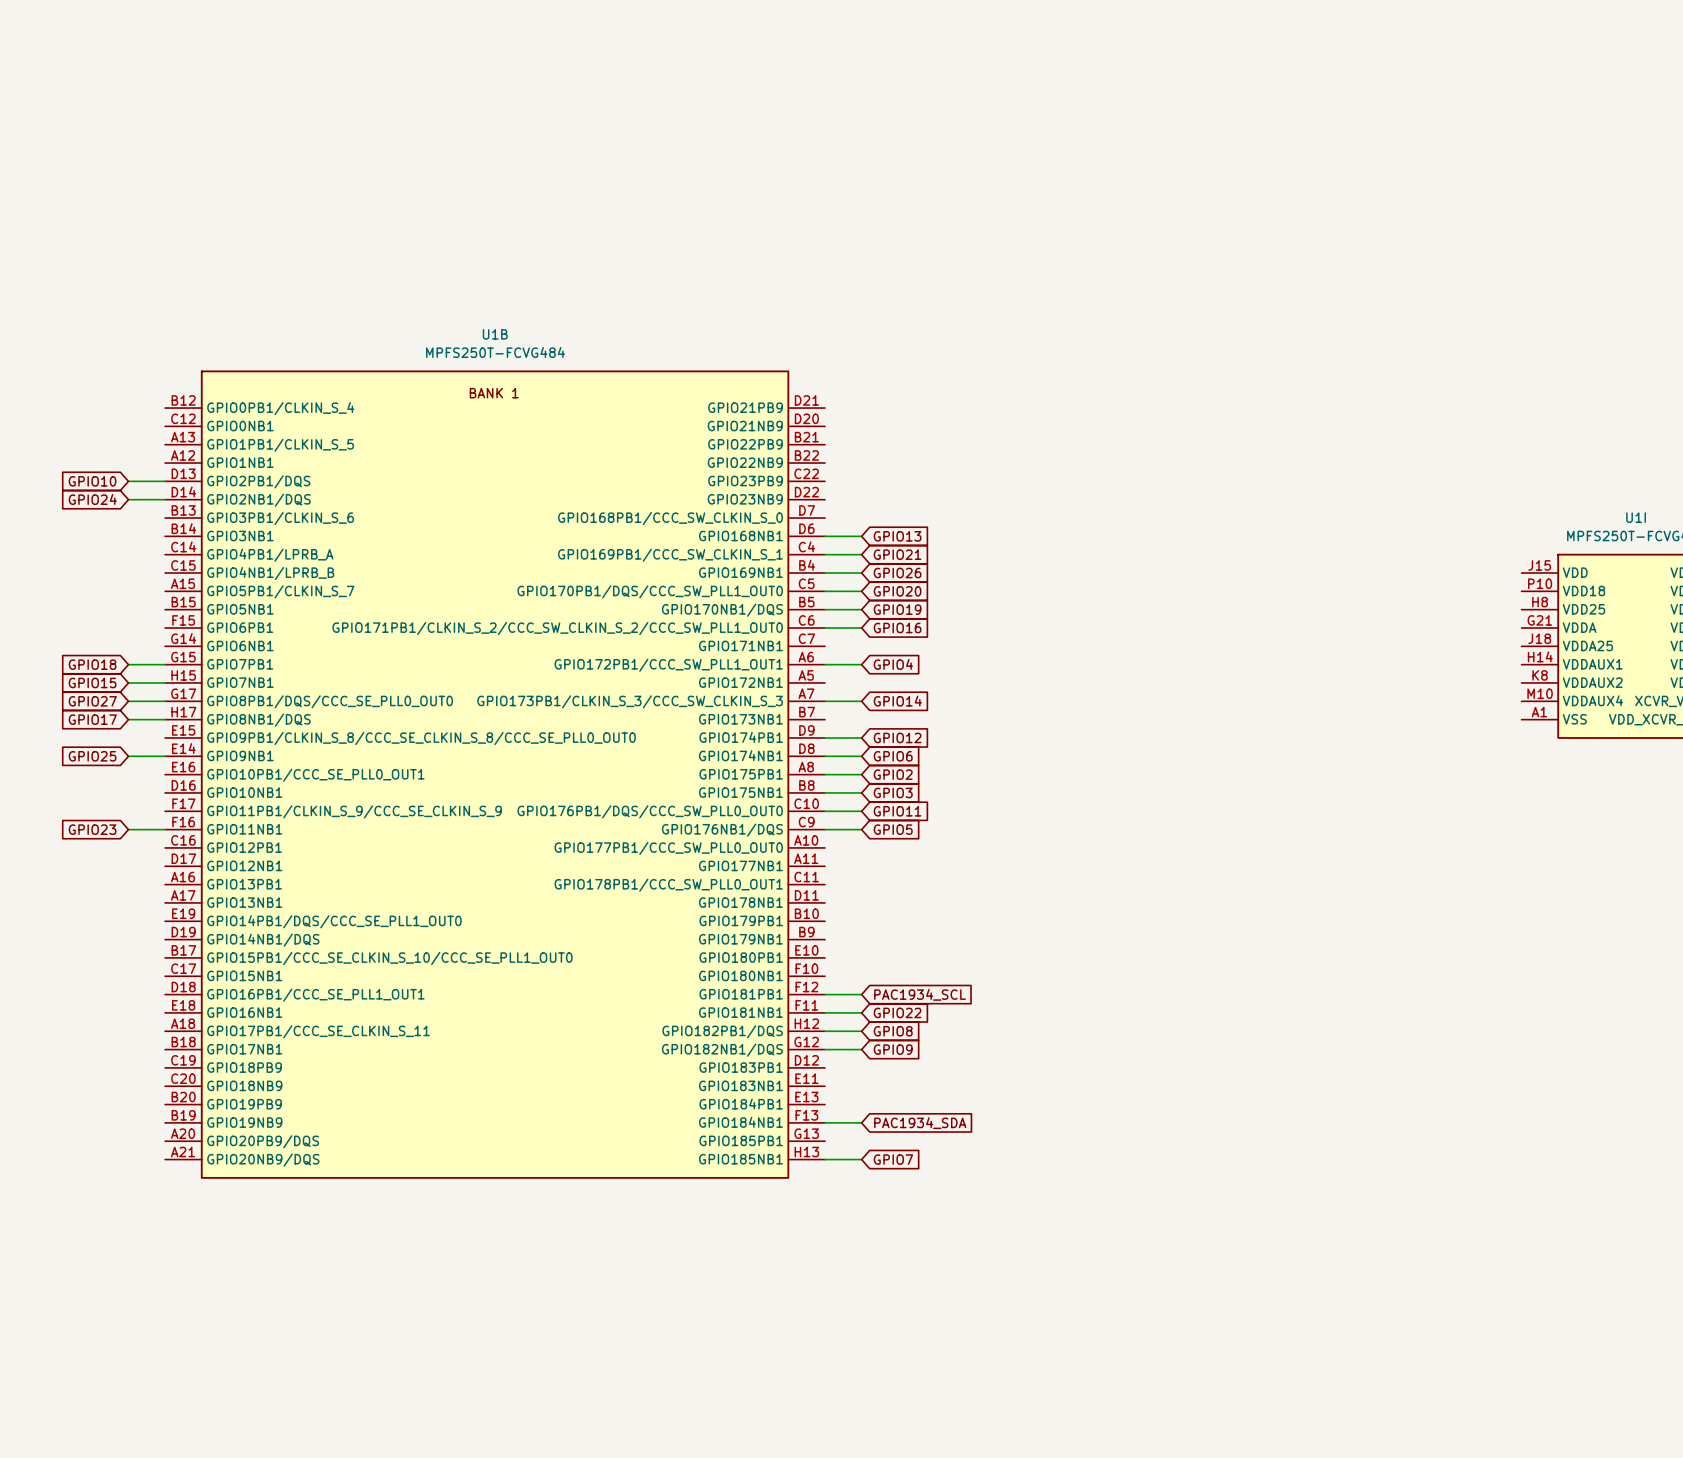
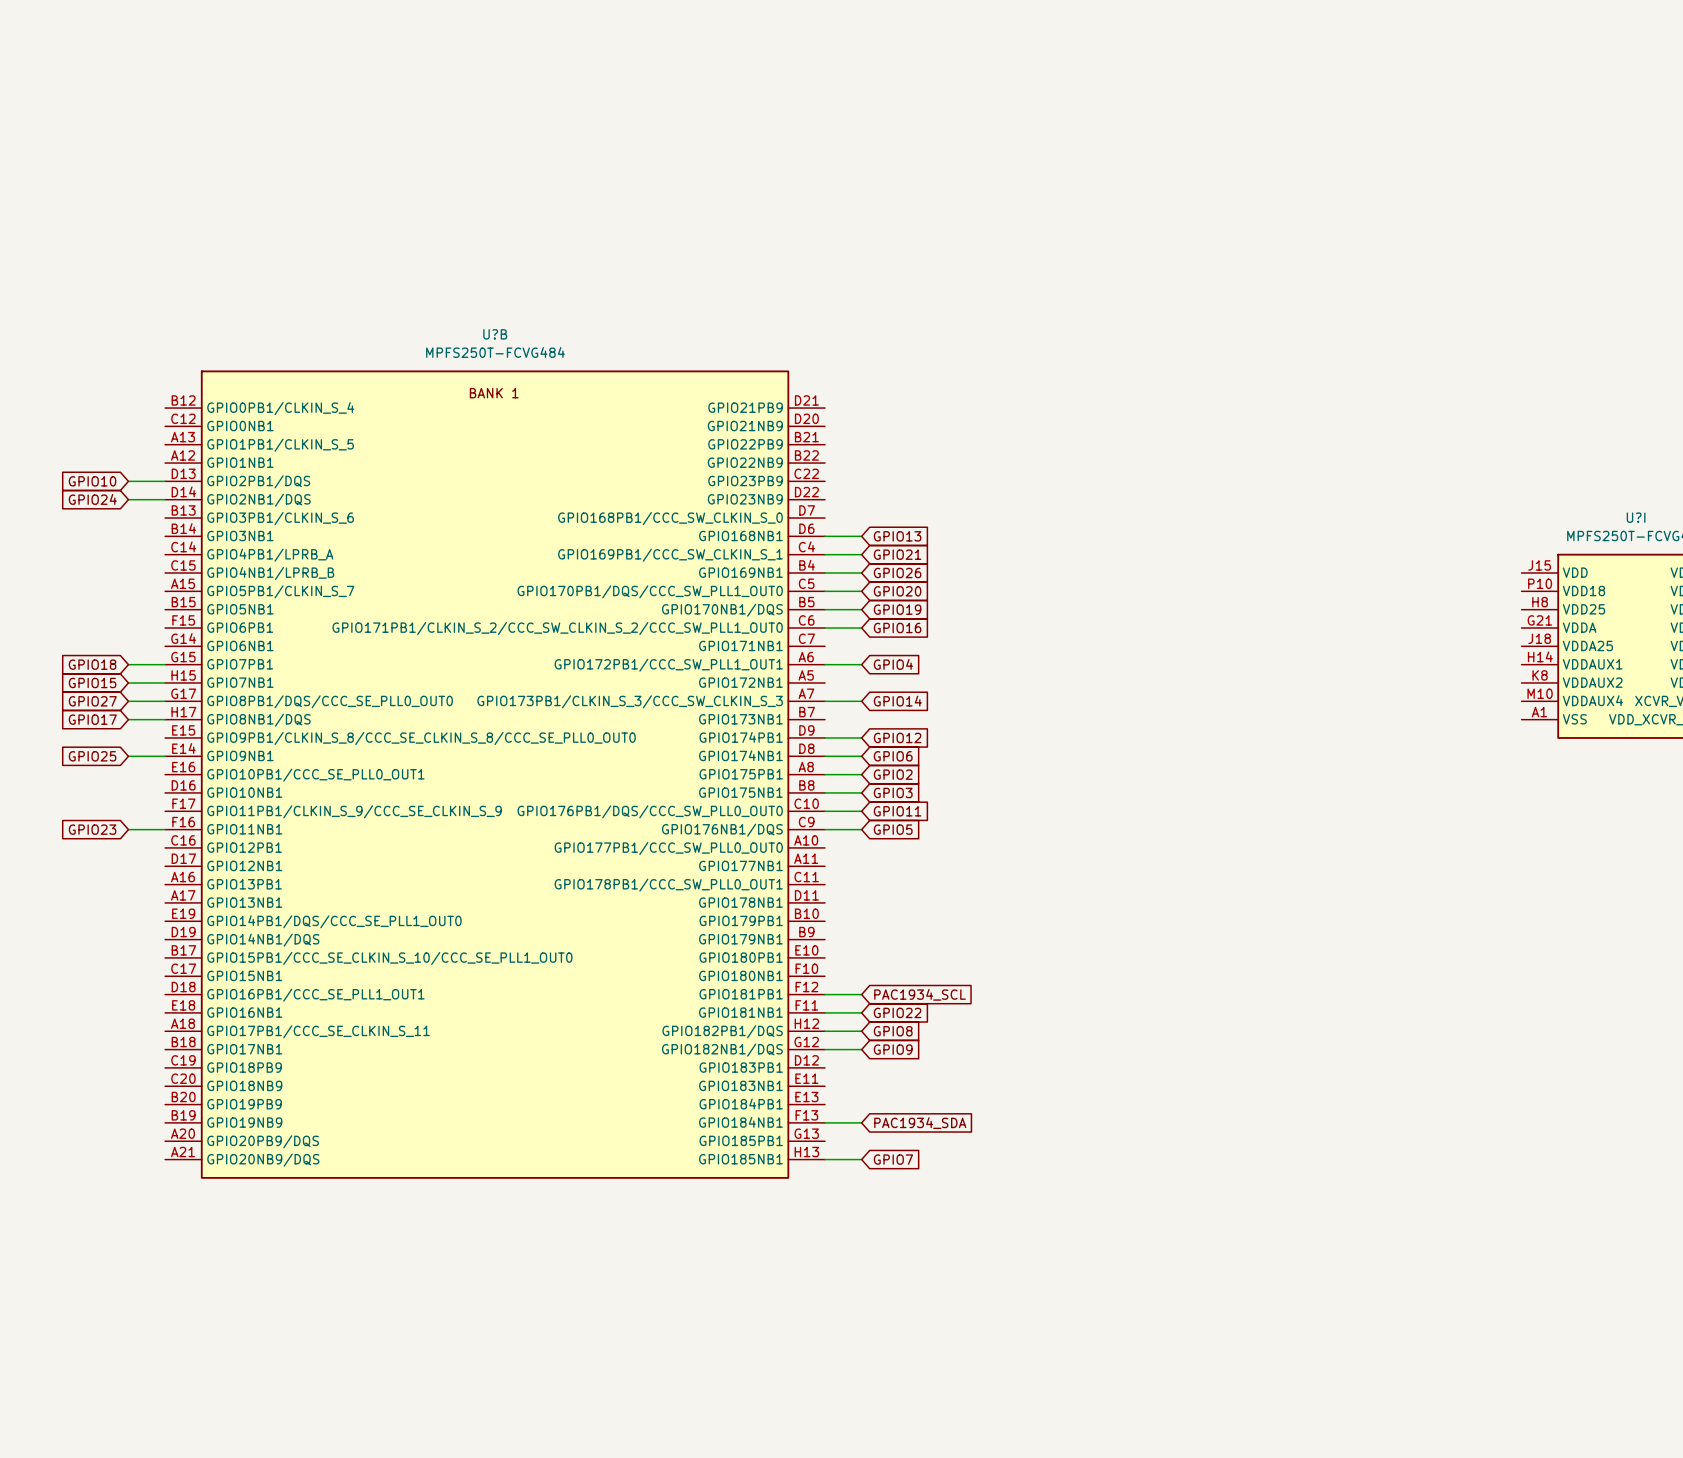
U1B name: U1B (495, 334) -> U?B (495, 334)
U1I name: U1I (1636, 517) -> U?I (1636, 517)

